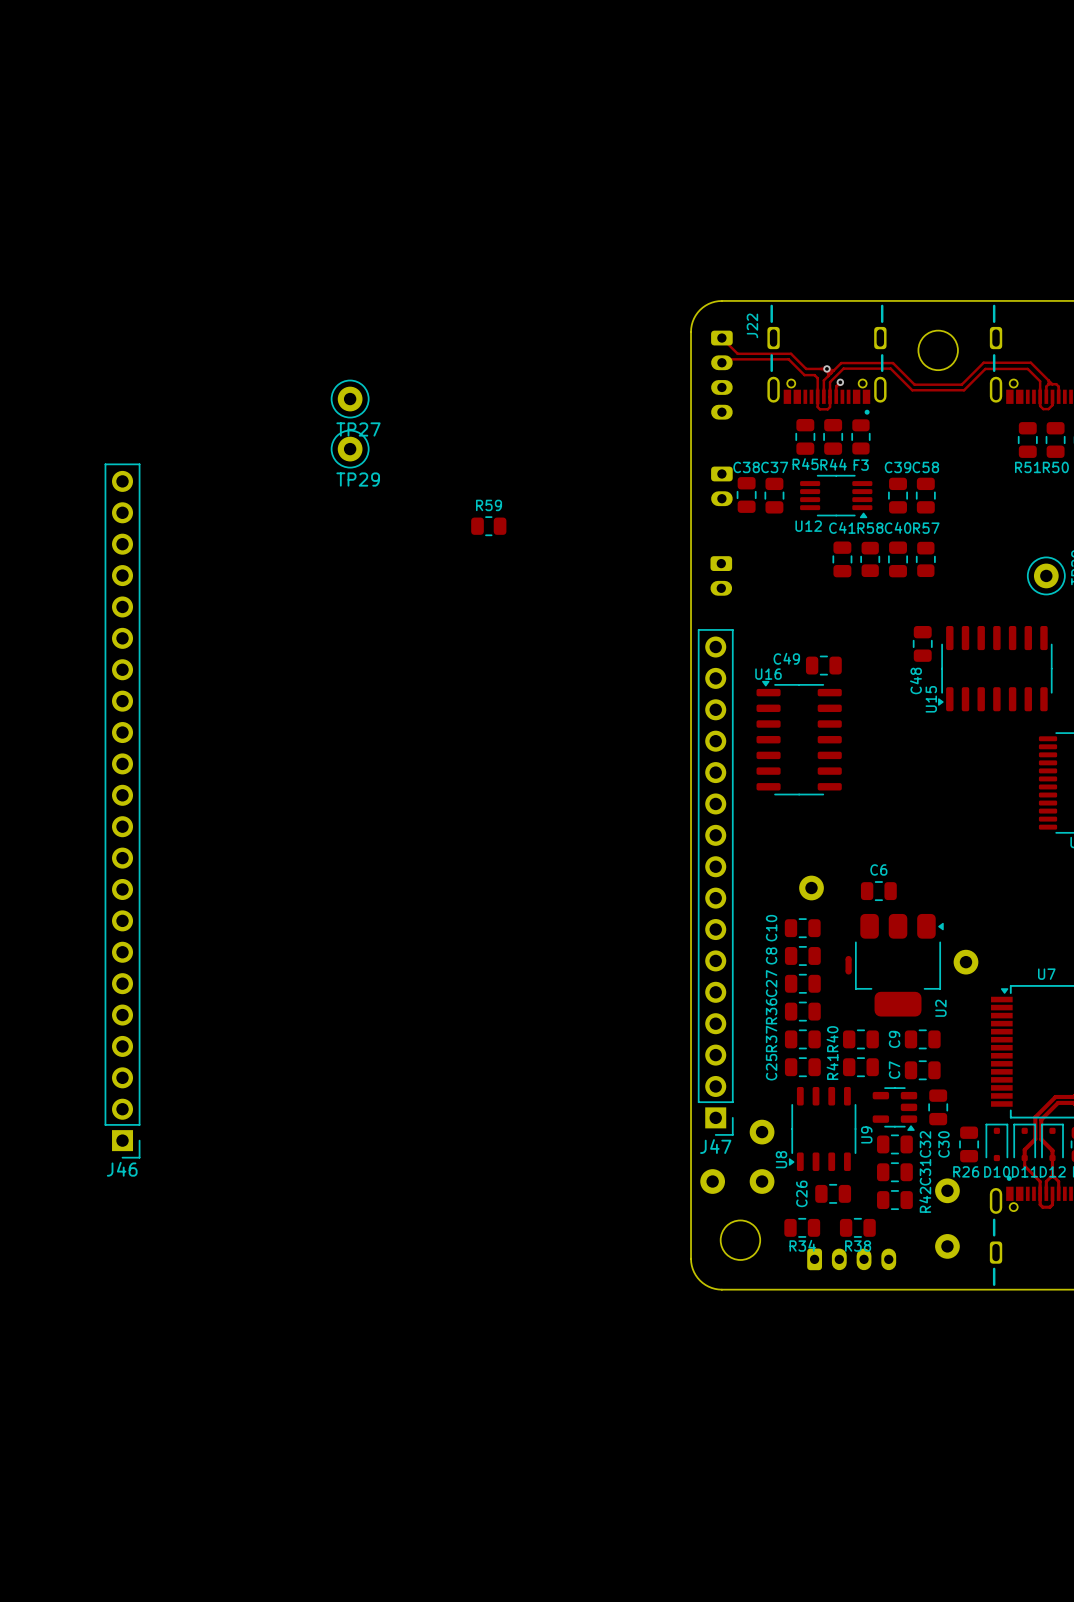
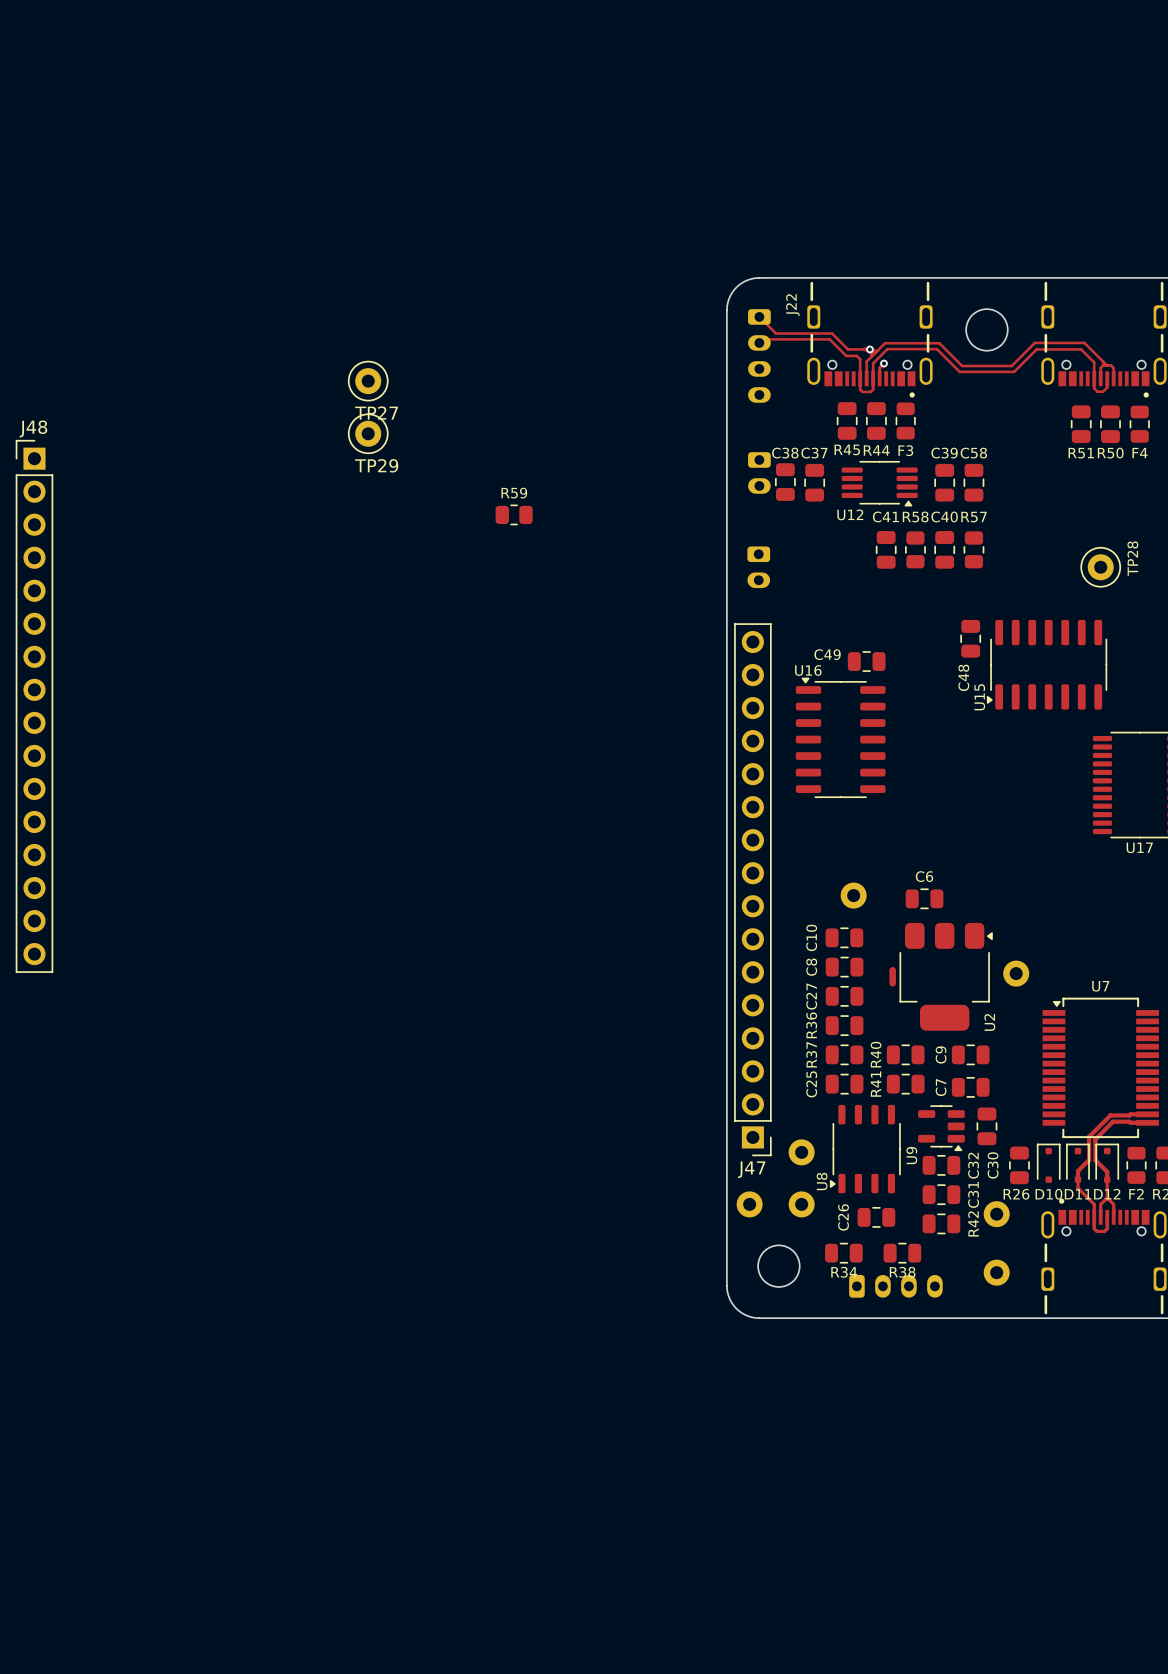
J48: none -> (34, 706)
J46: (122, 811) -> none

